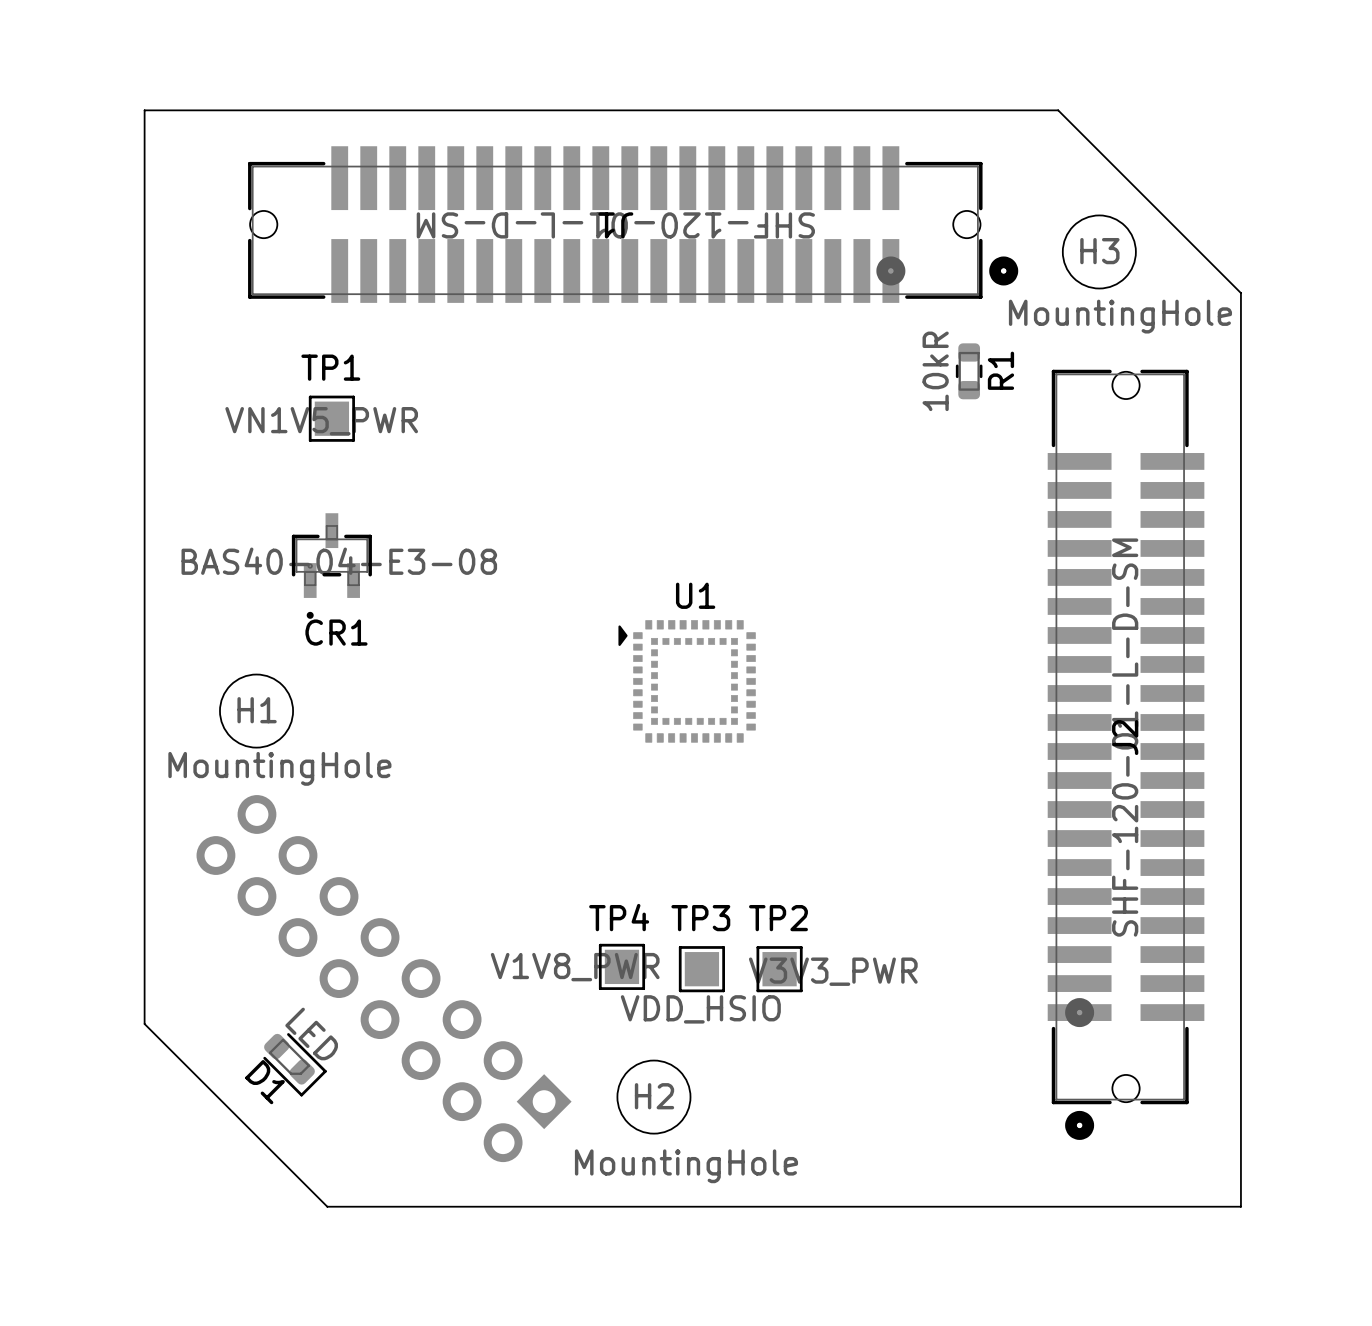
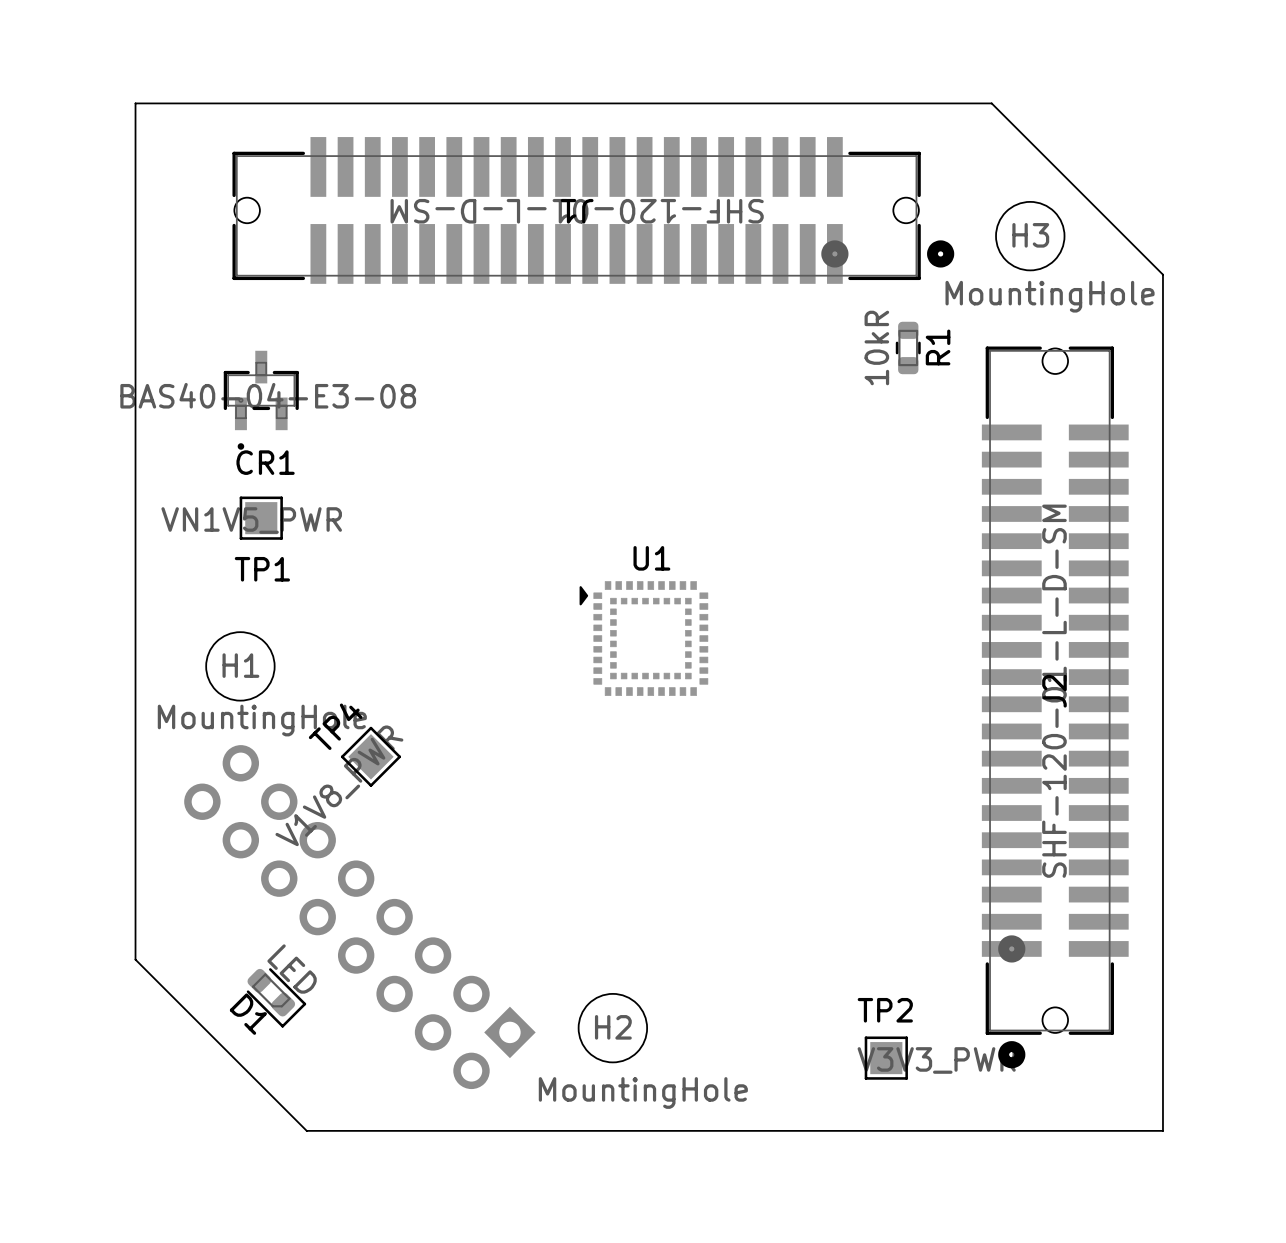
TP1 name position: TP1 (330, 367) -> TP1 (262, 569)
TP1 position: (331, 418) -> (261, 518)
CR1 position: (331, 566) -> (261, 400)
TP4 rotation: 0° (621, 966) -> 45° clockwise (370, 756)
TP4 position: (621, 966) -> (370, 756)
TP3: VDD_HSIO (701, 969) -> none
TP2 position: (779, 969) -> (886, 1058)

